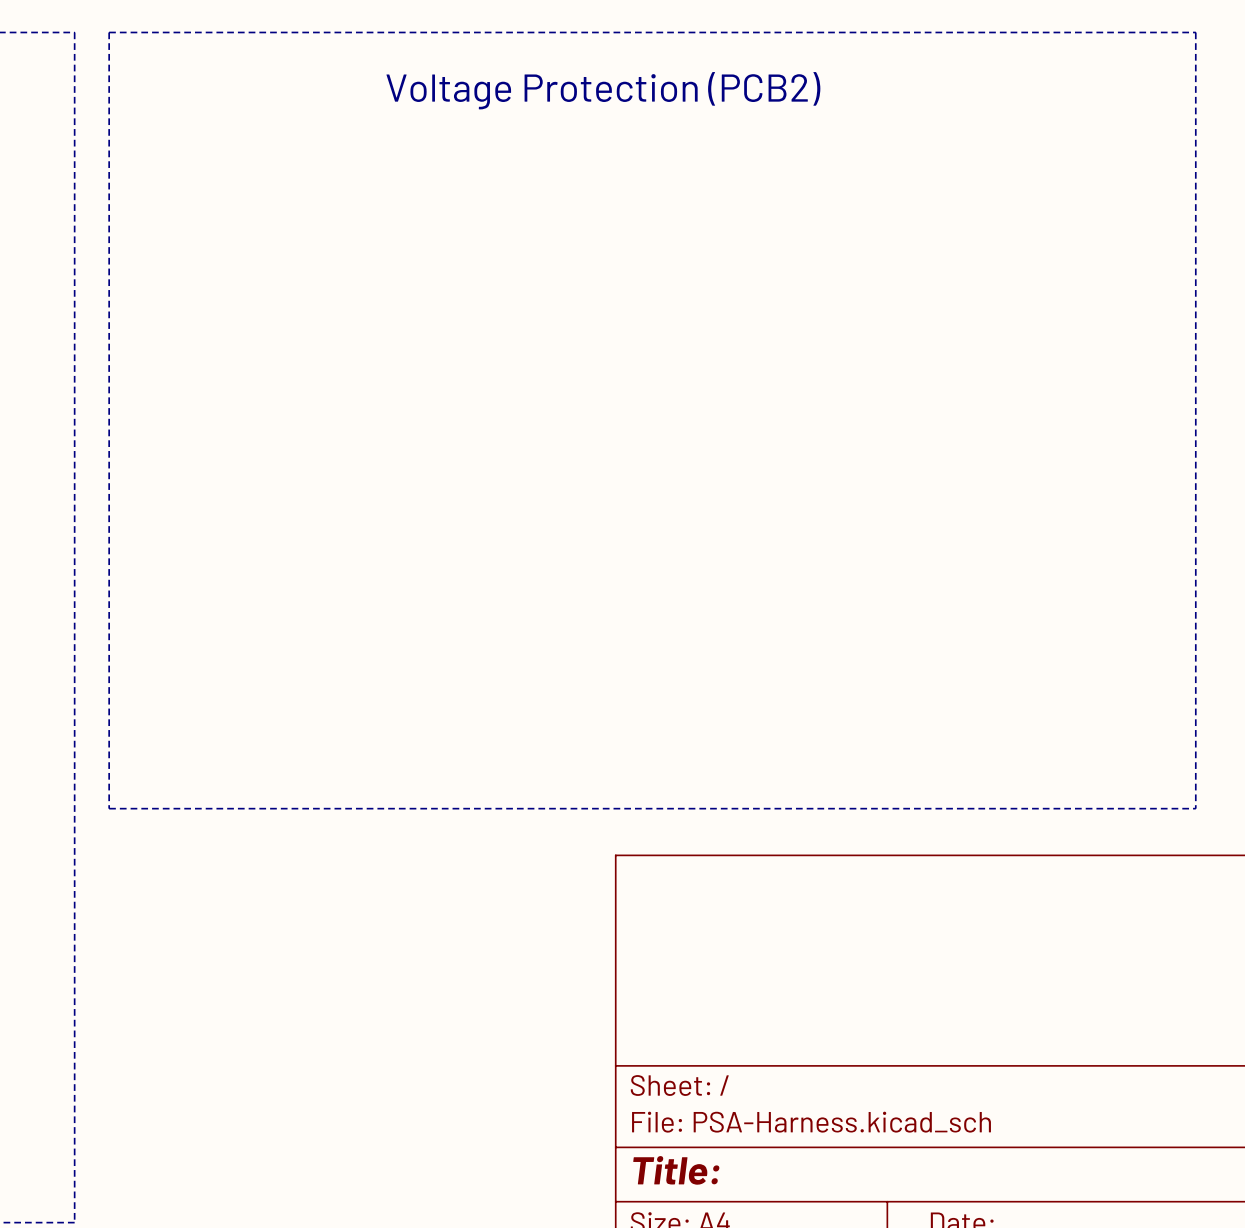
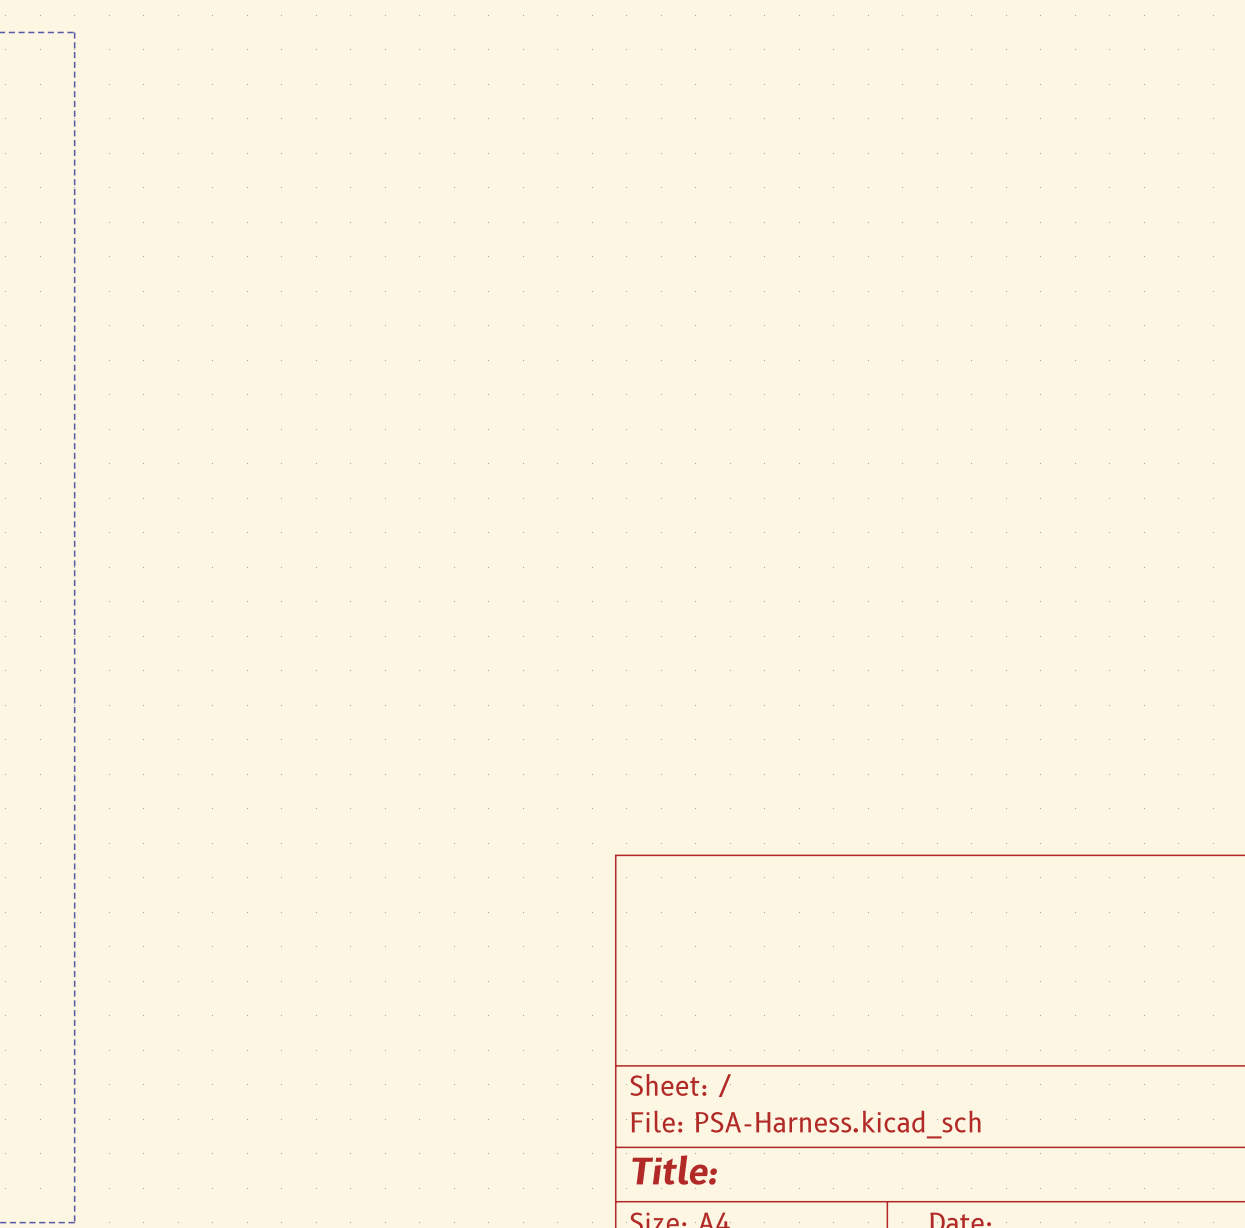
line: (109, 32) (109, 808) (1195, 808) (1195, 32) (109, 32) -> none
text: Voltage Protection (PCB2) (603, 90) -> none

